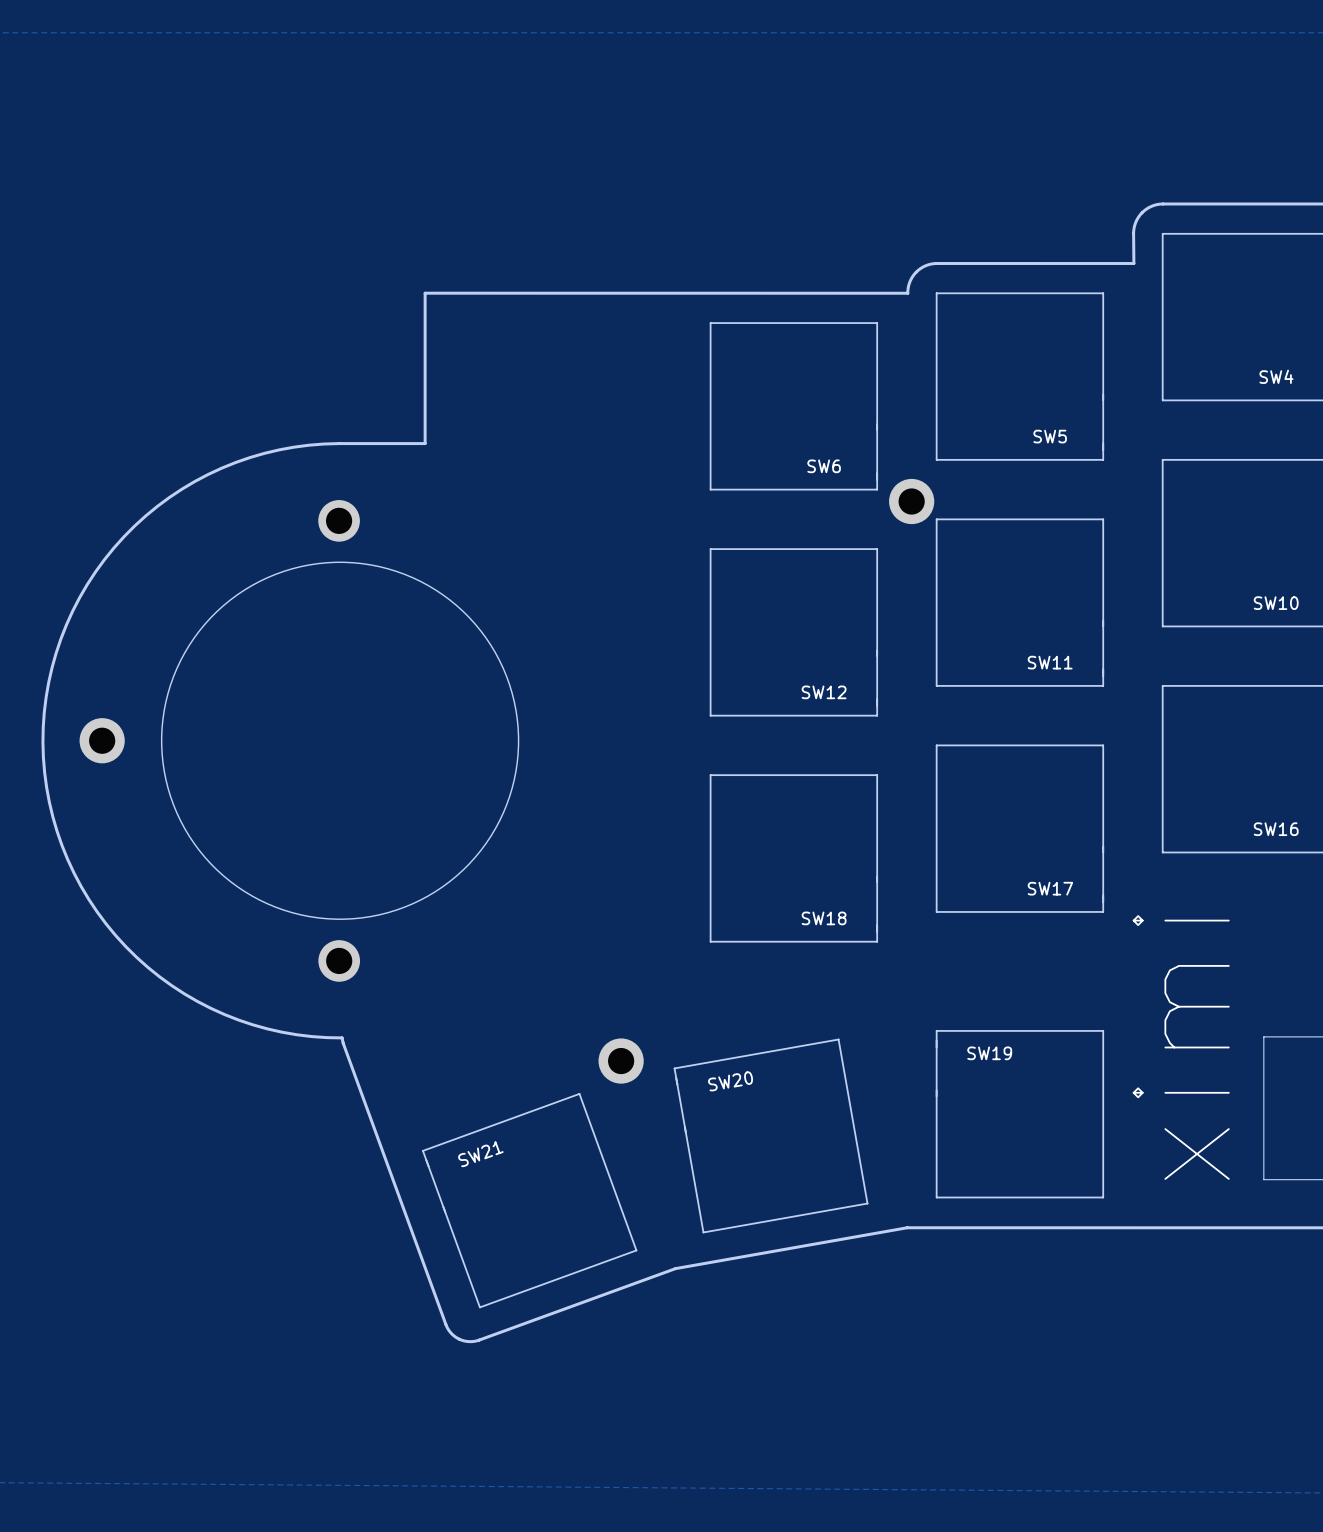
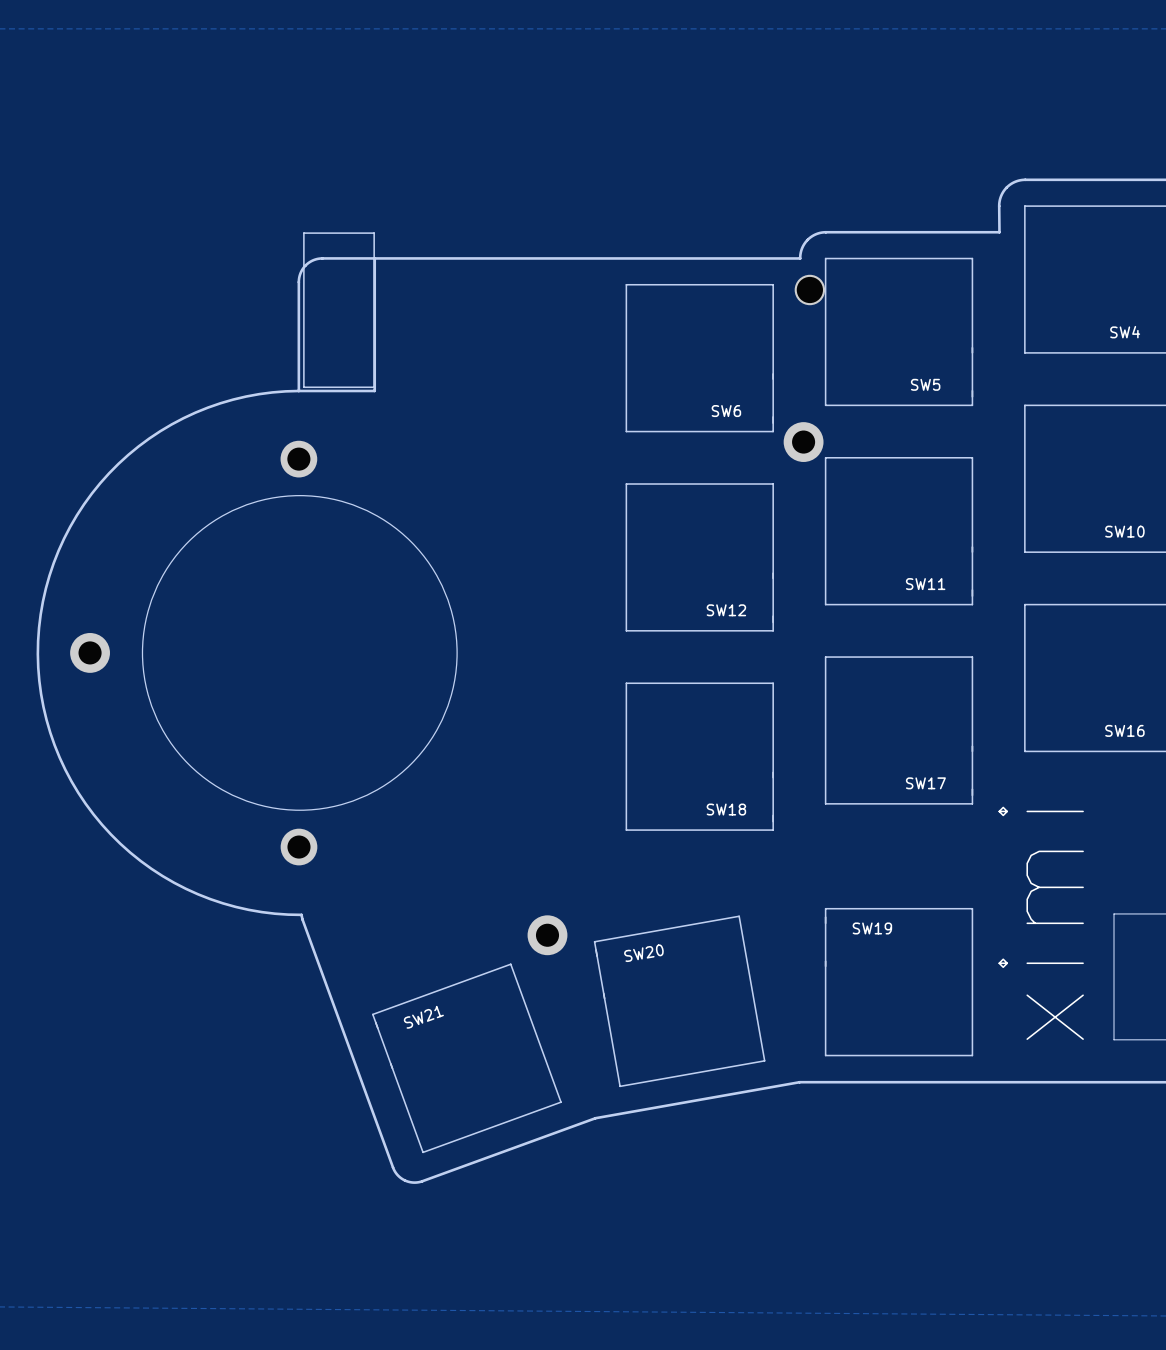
drawing: none -> [303, 232, 375, 389]
board edge: none -> (374, 258) (318, 258) (309, 262) (302, 269) (298, 280) (298, 390)
part: none -> (809, 289)

